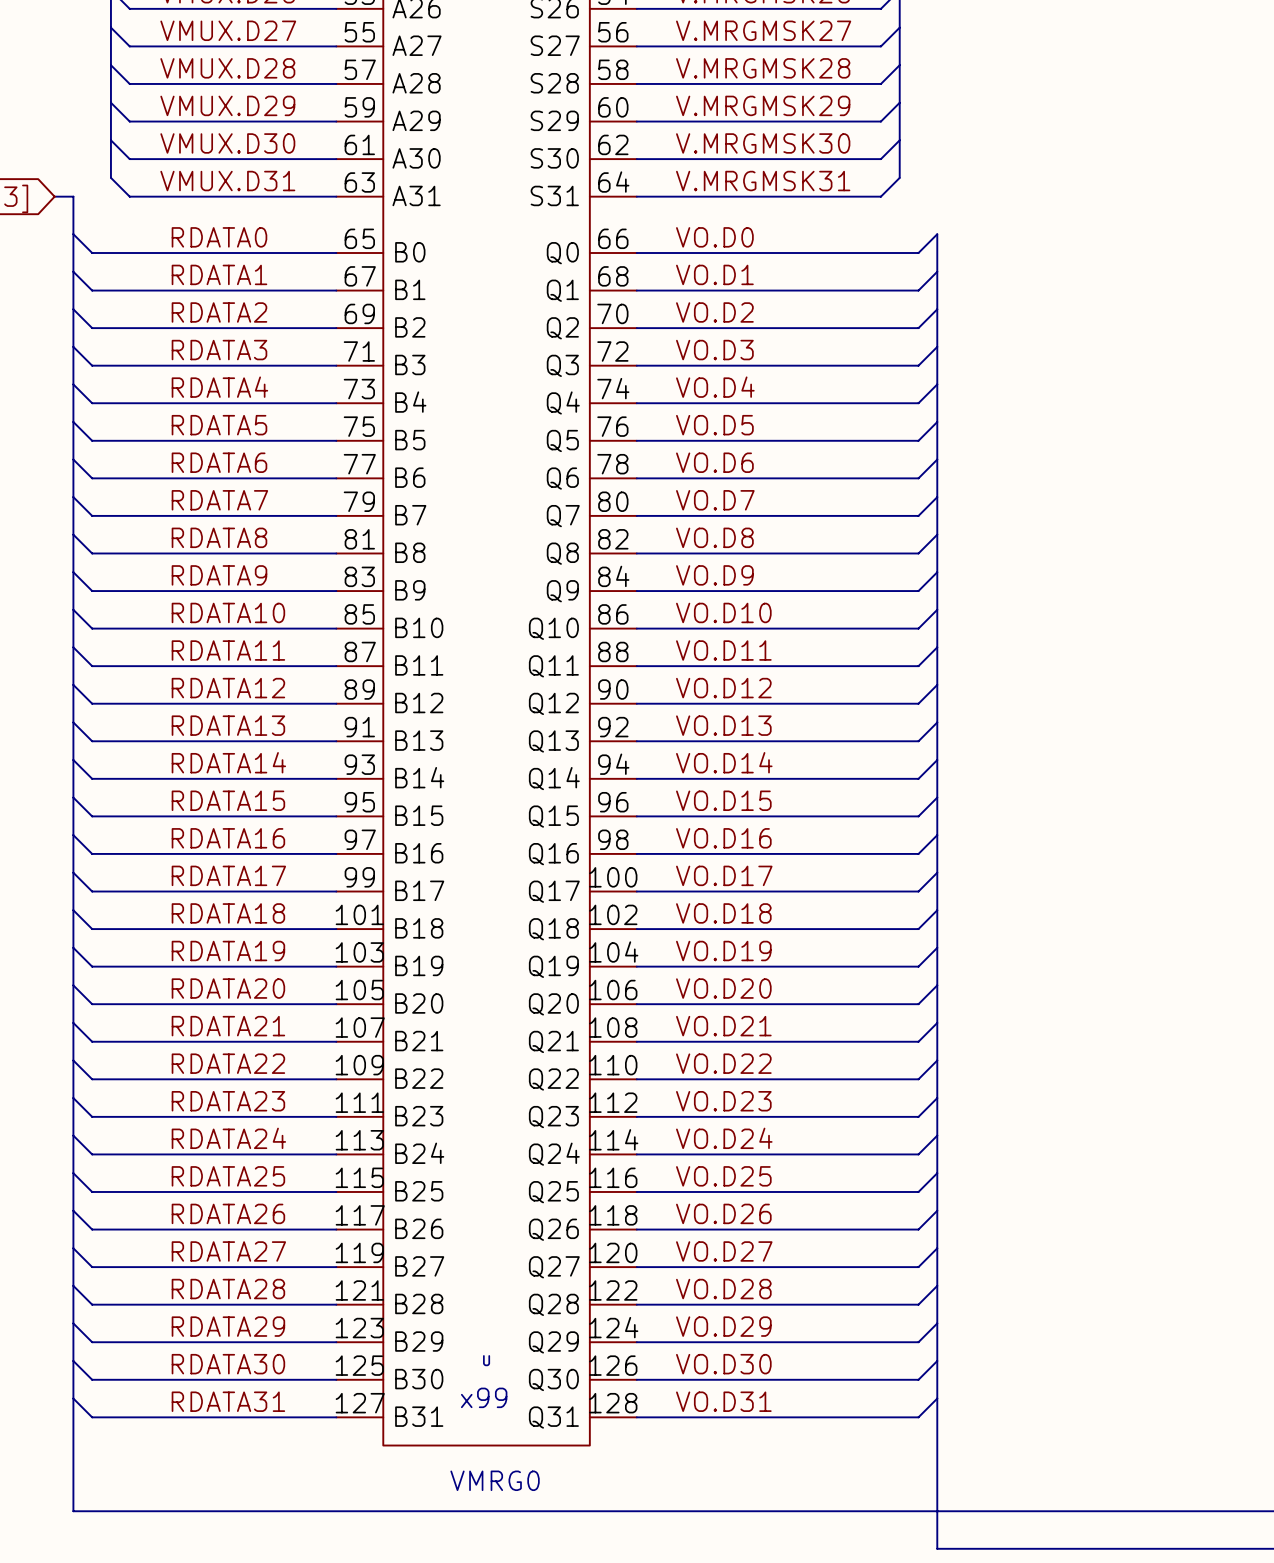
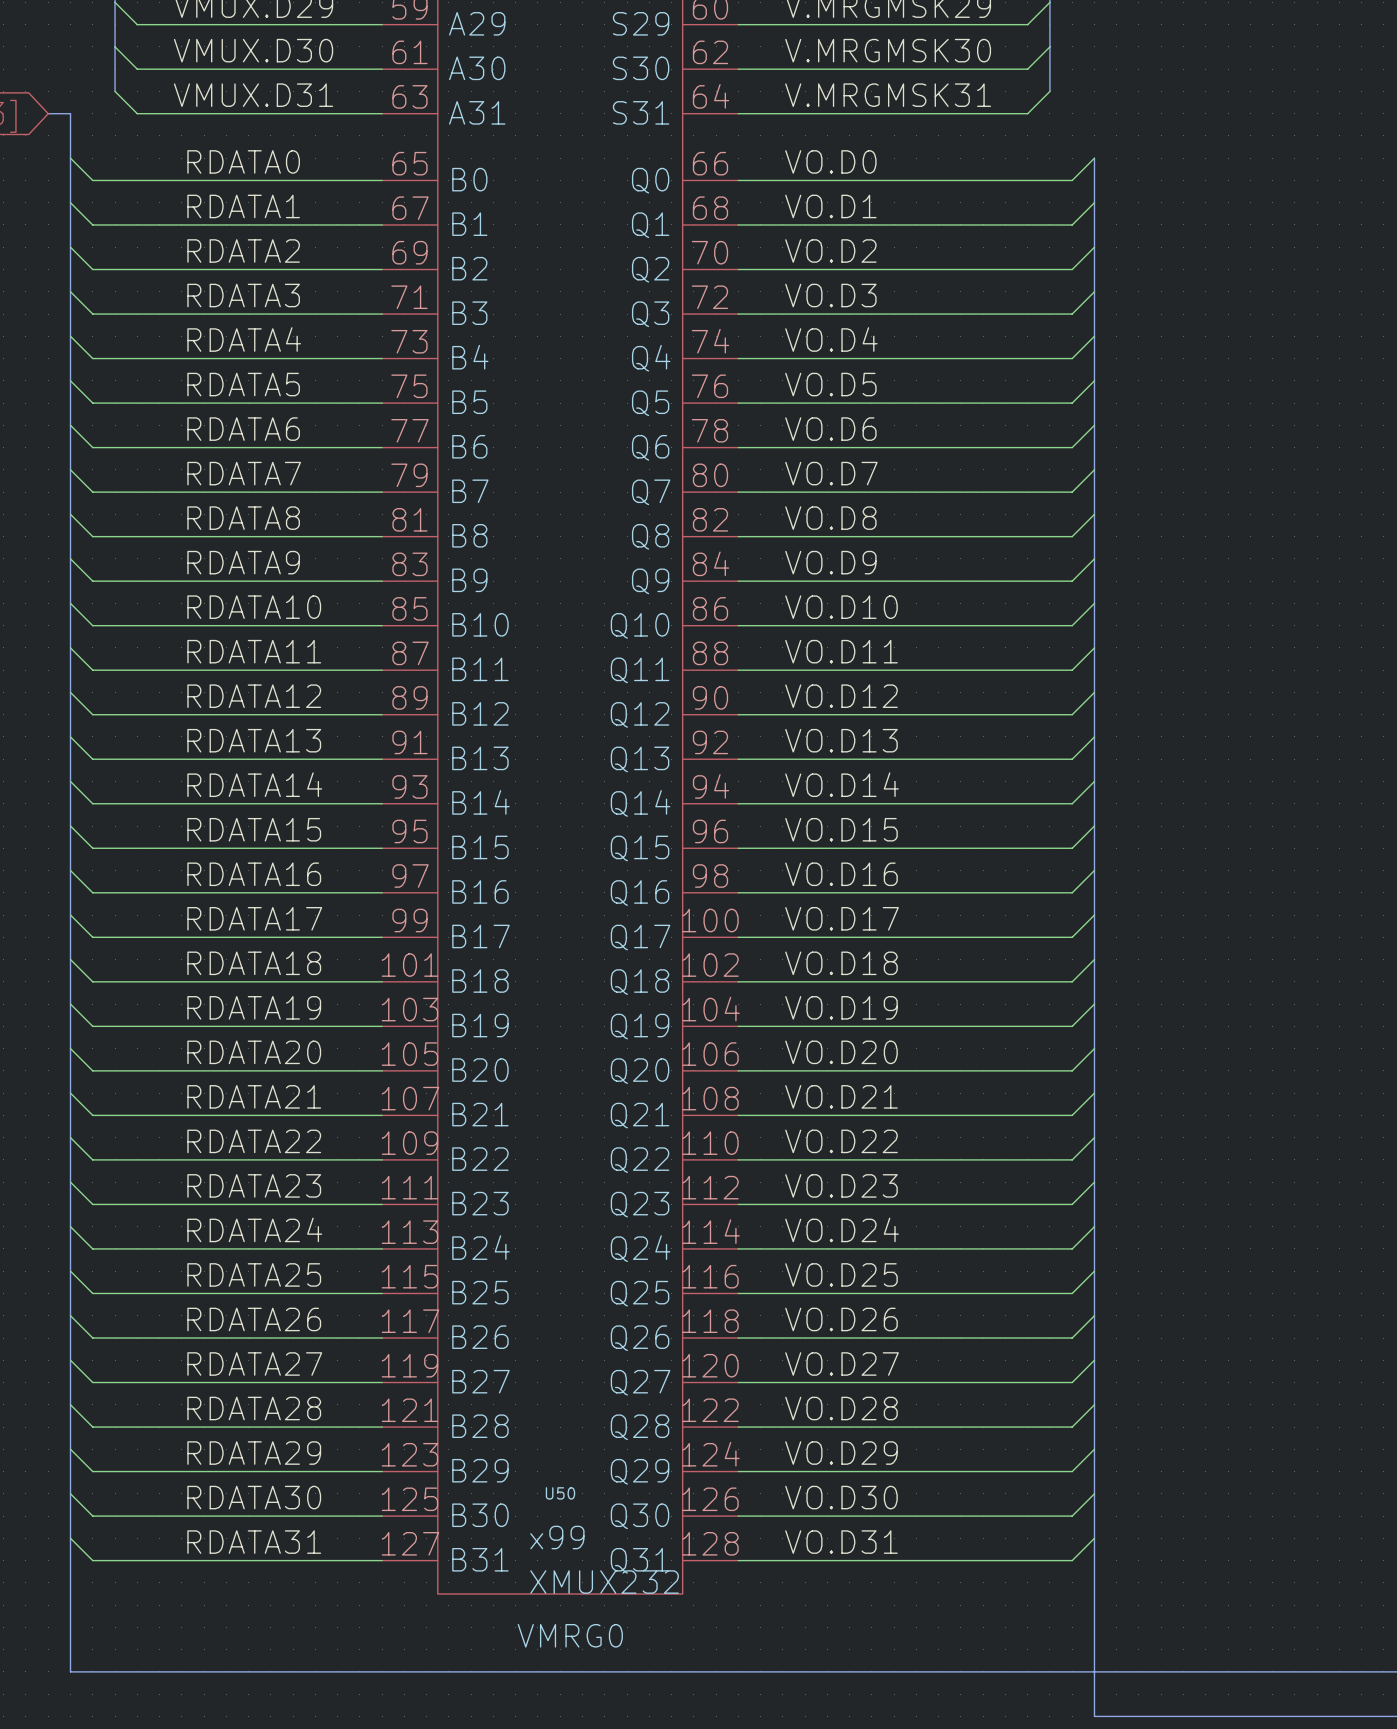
U name: U (486, 1360) -> U50 (560, 1493)
U value: none -> XMUX232 (604, 1582)

